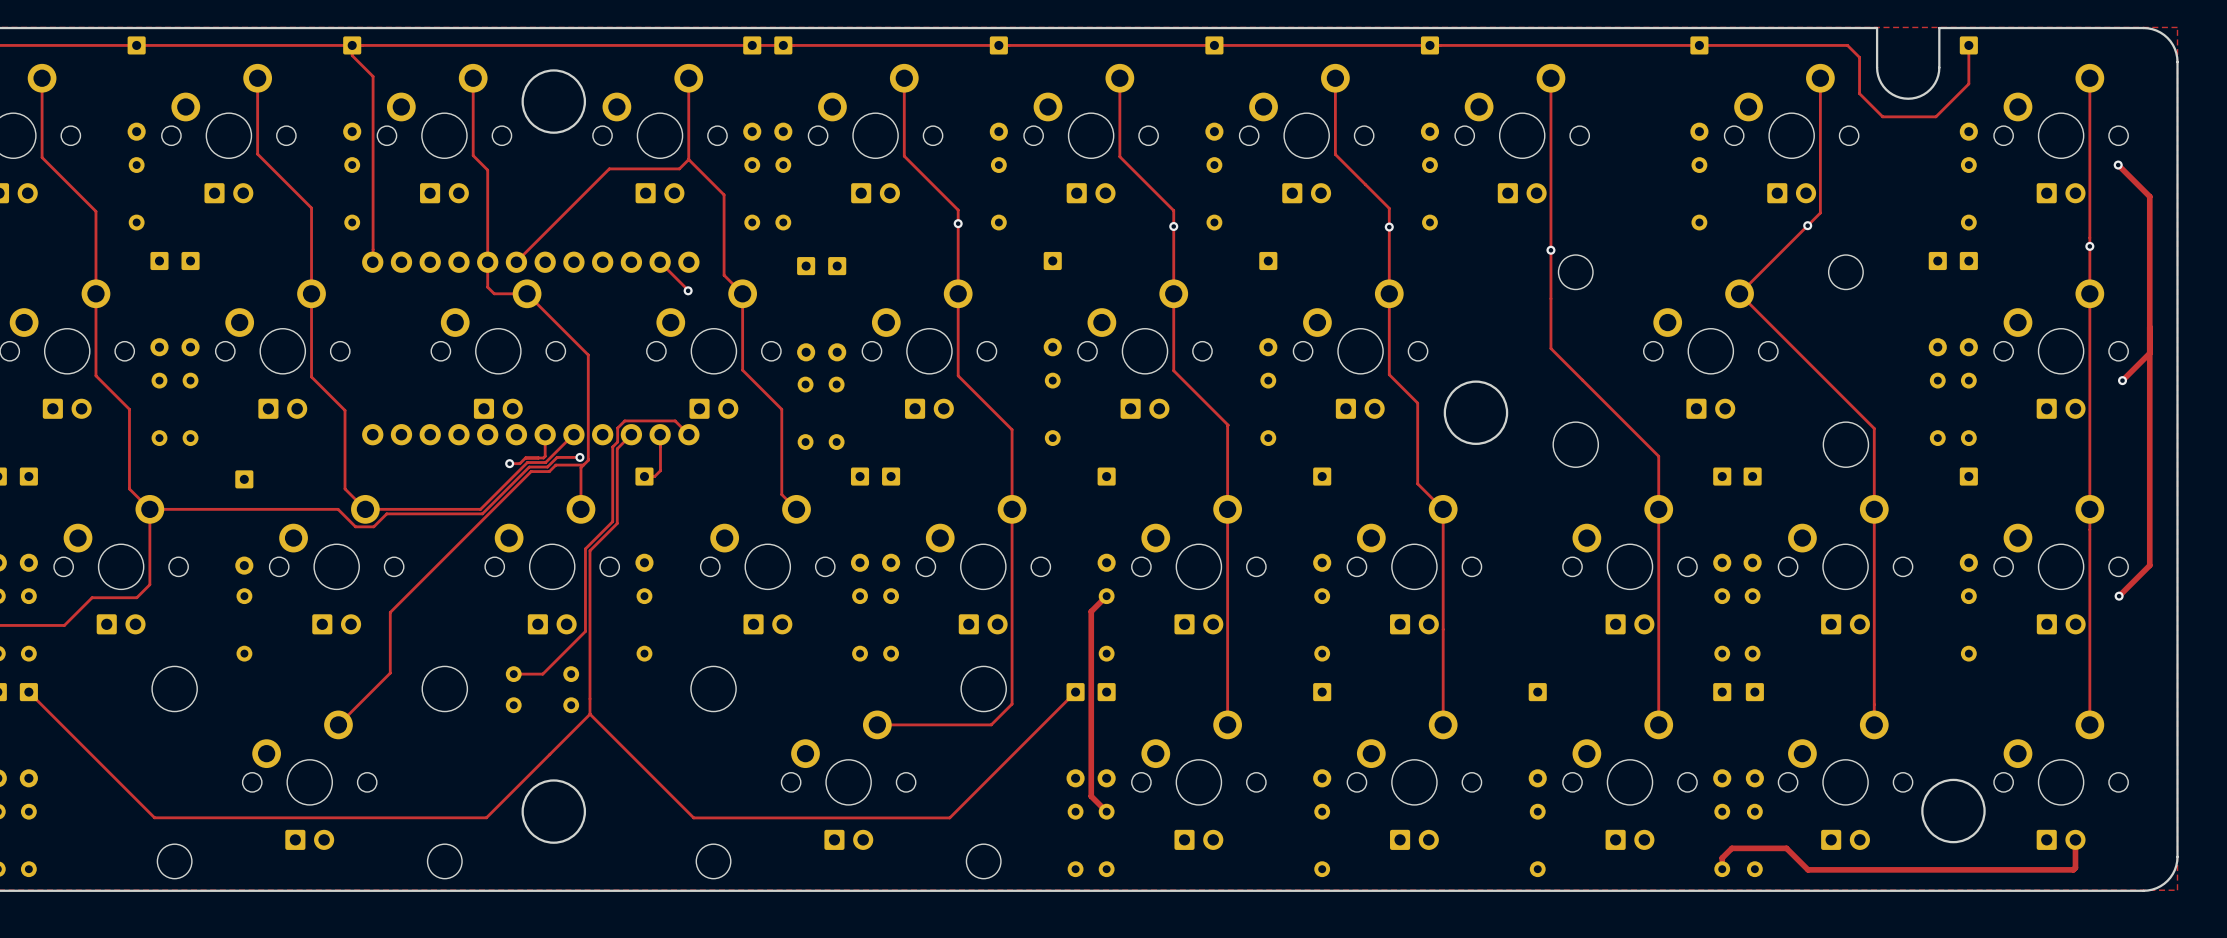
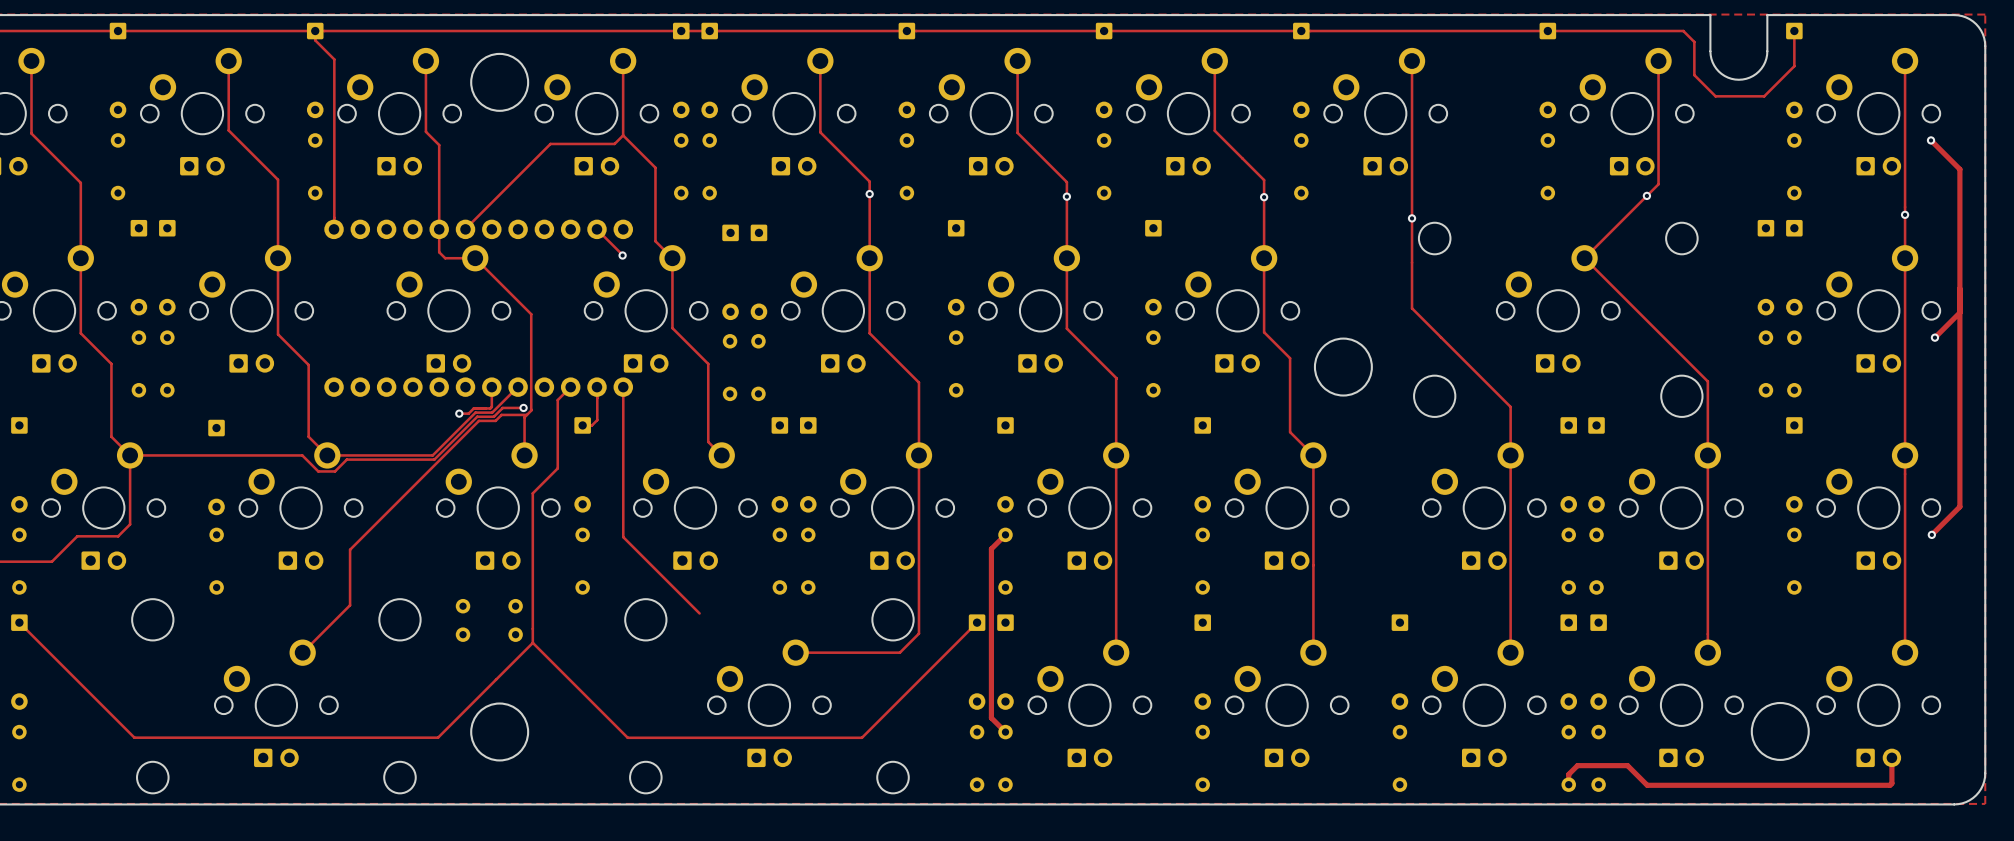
track: (688, 434) (675, 420) (624, 420) (617, 428) (617, 442) (612, 446) (612, 521) (585, 548) (585, 631) (542, 674) (513, 674) -> (623, 387) (623, 537) (699, 613)

